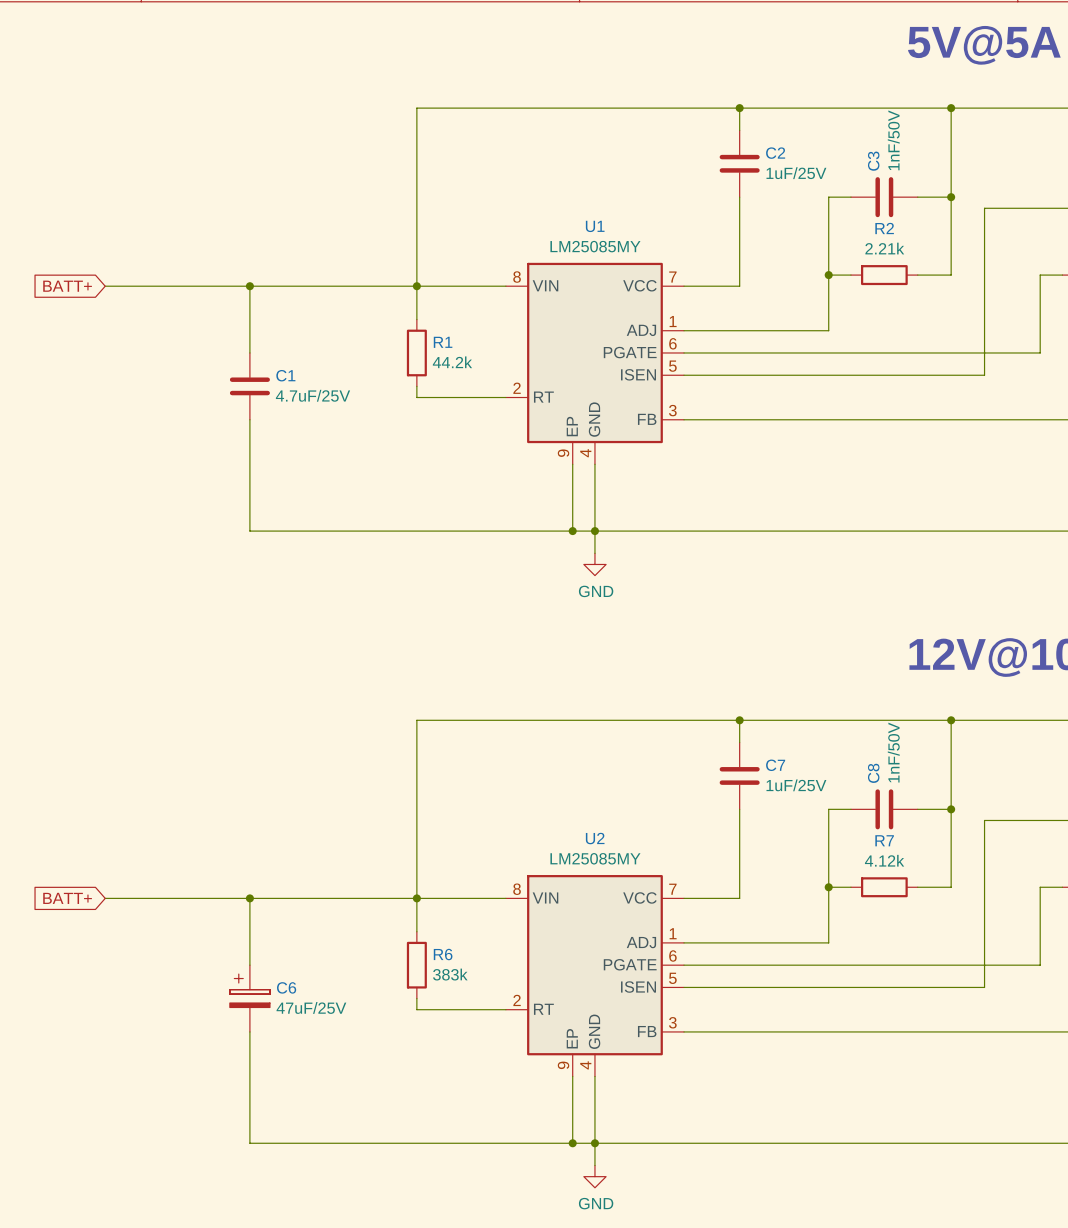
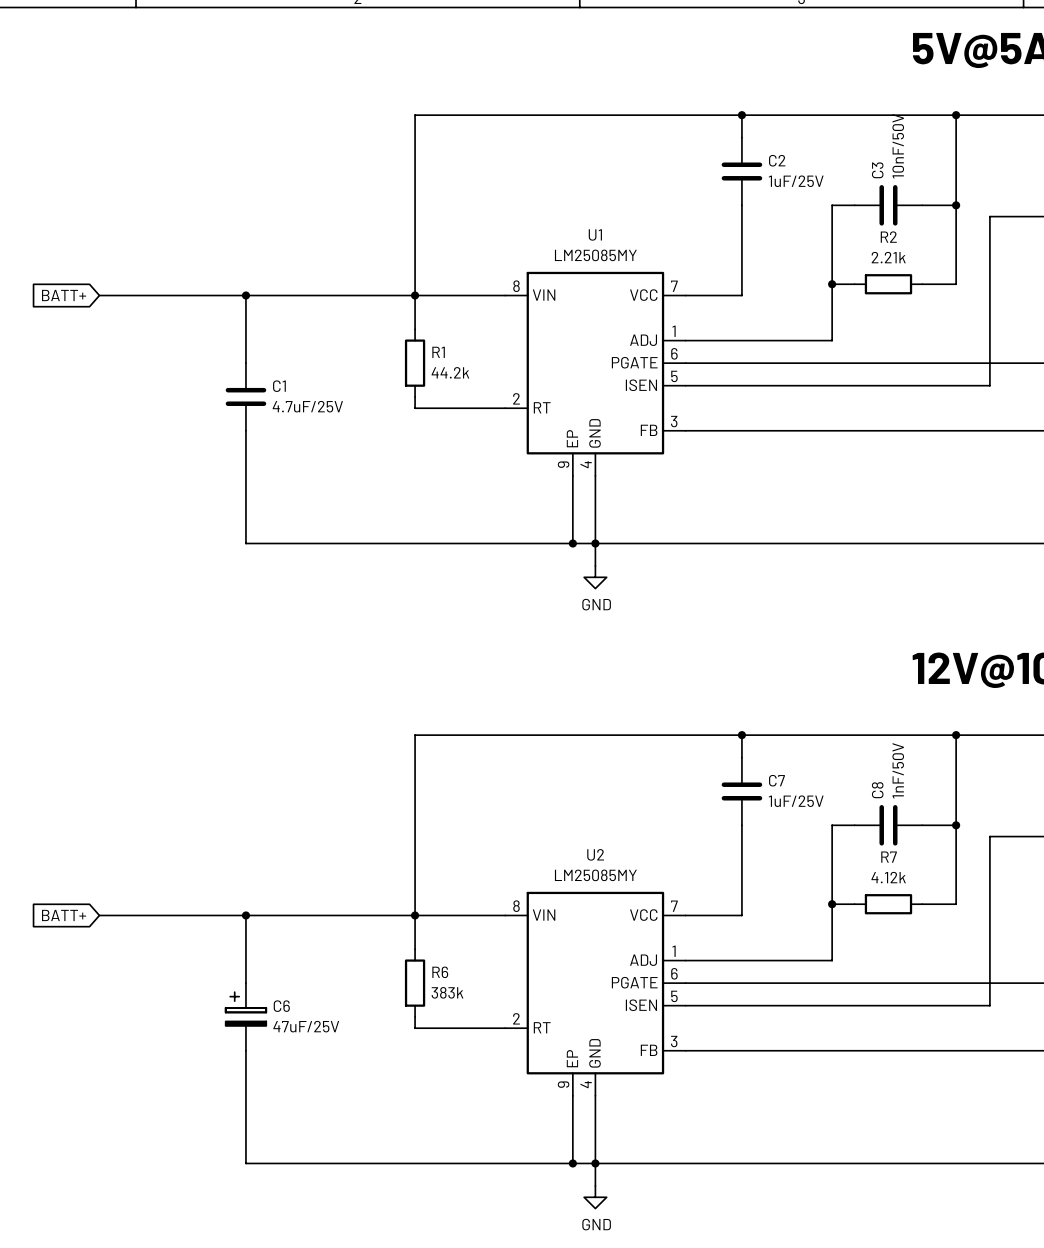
C3 value: 1nF/50V (893, 140) -> 10nF/50V (898, 146)

